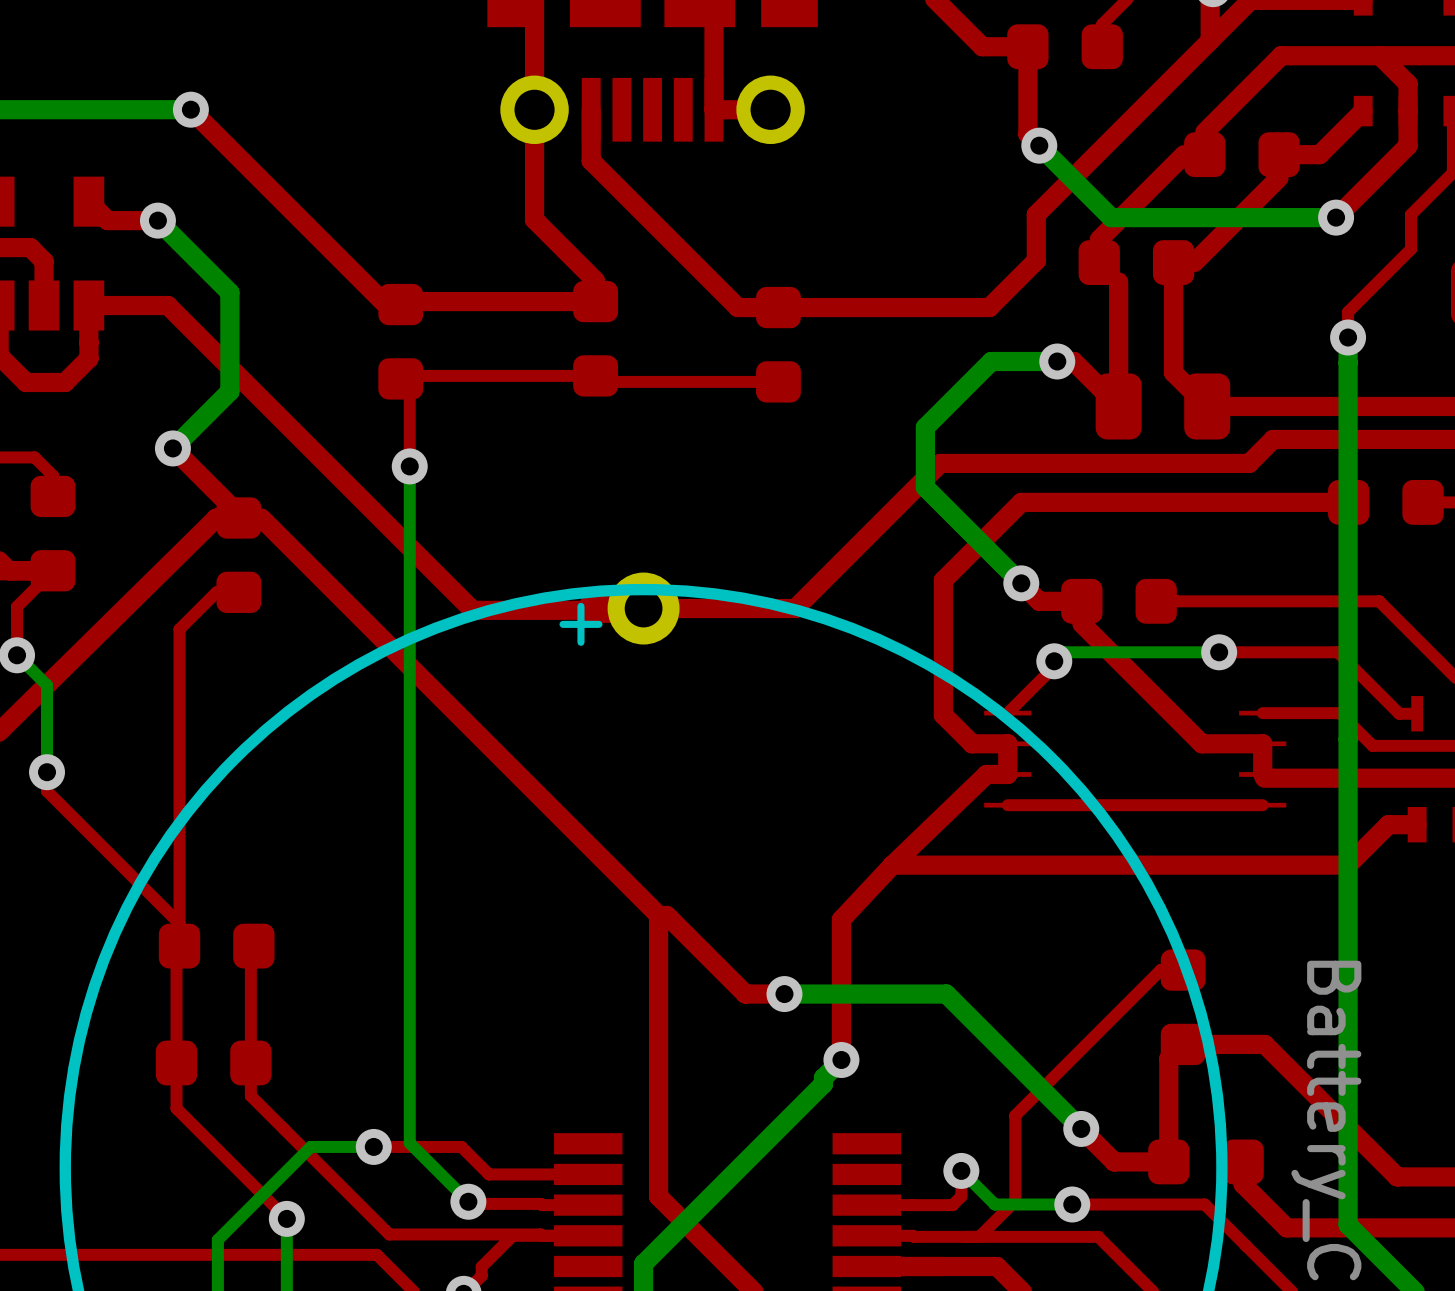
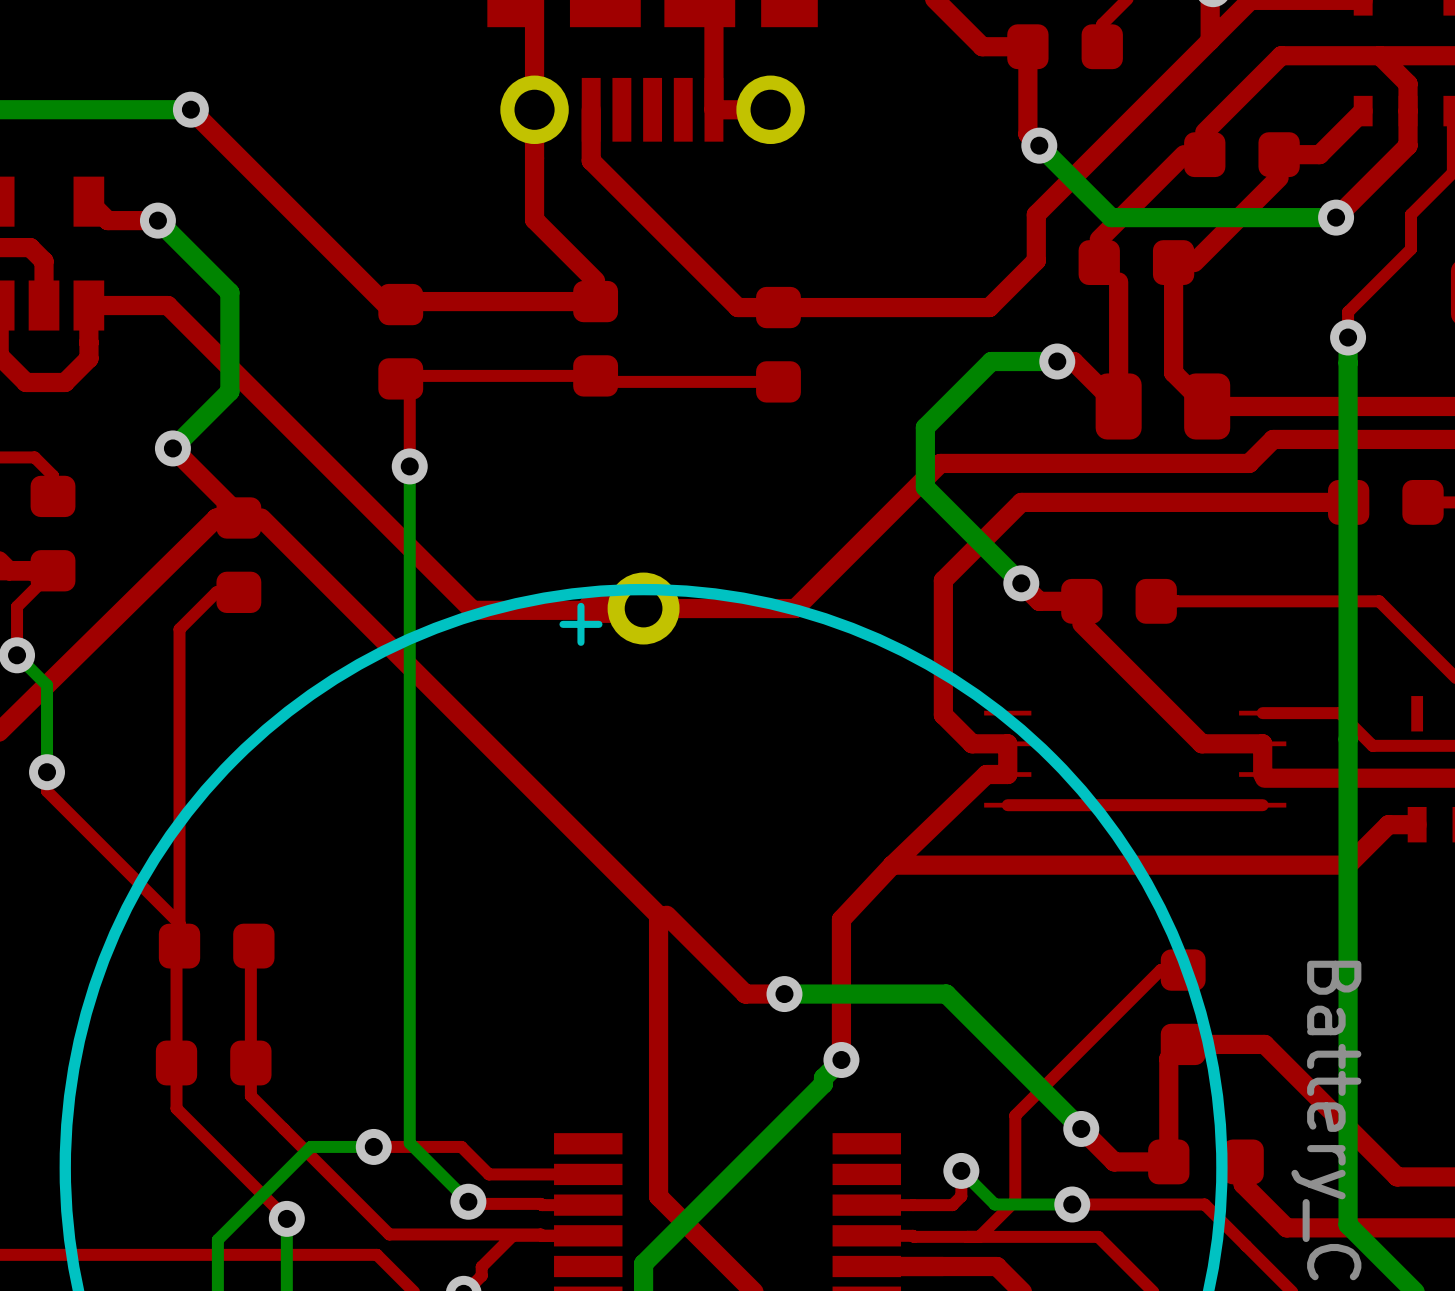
top track: (1219, 652) (1337, 652) (1399, 713) (1417, 713) -> none
bottom track: (1219, 652) (1063, 652) (1054, 661) -> none
via: (1219, 652) -> none
top track: (1054, 661) (1054, 666) (1007, 713) -> none
via: (1054, 661) -> none

